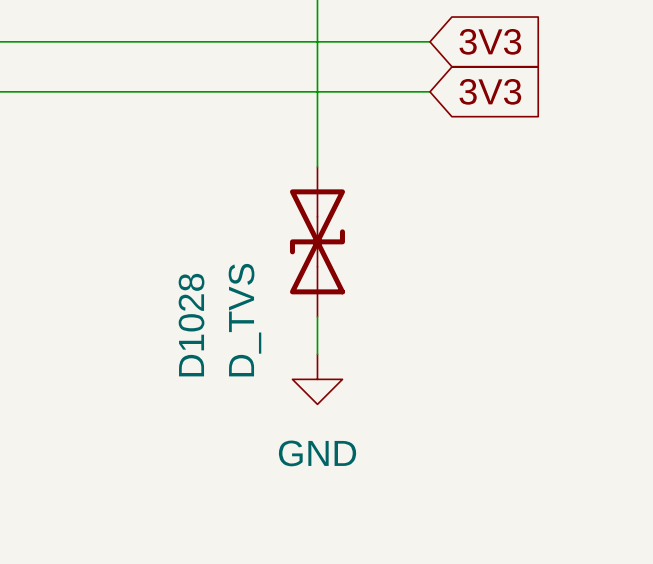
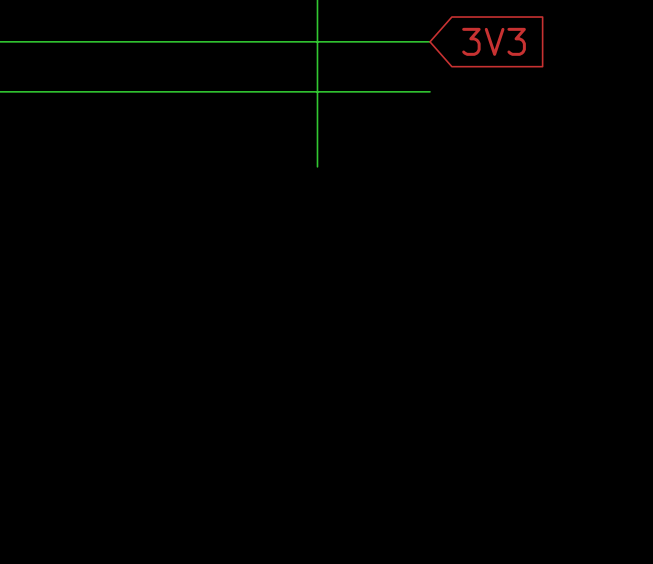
global label: 3V3 (490, 91) -> none
D1028: D_TVS (317, 241) -> none
wire: (317, 316) (317, 354) -> none
power symbol: GND (317, 379) -> none

